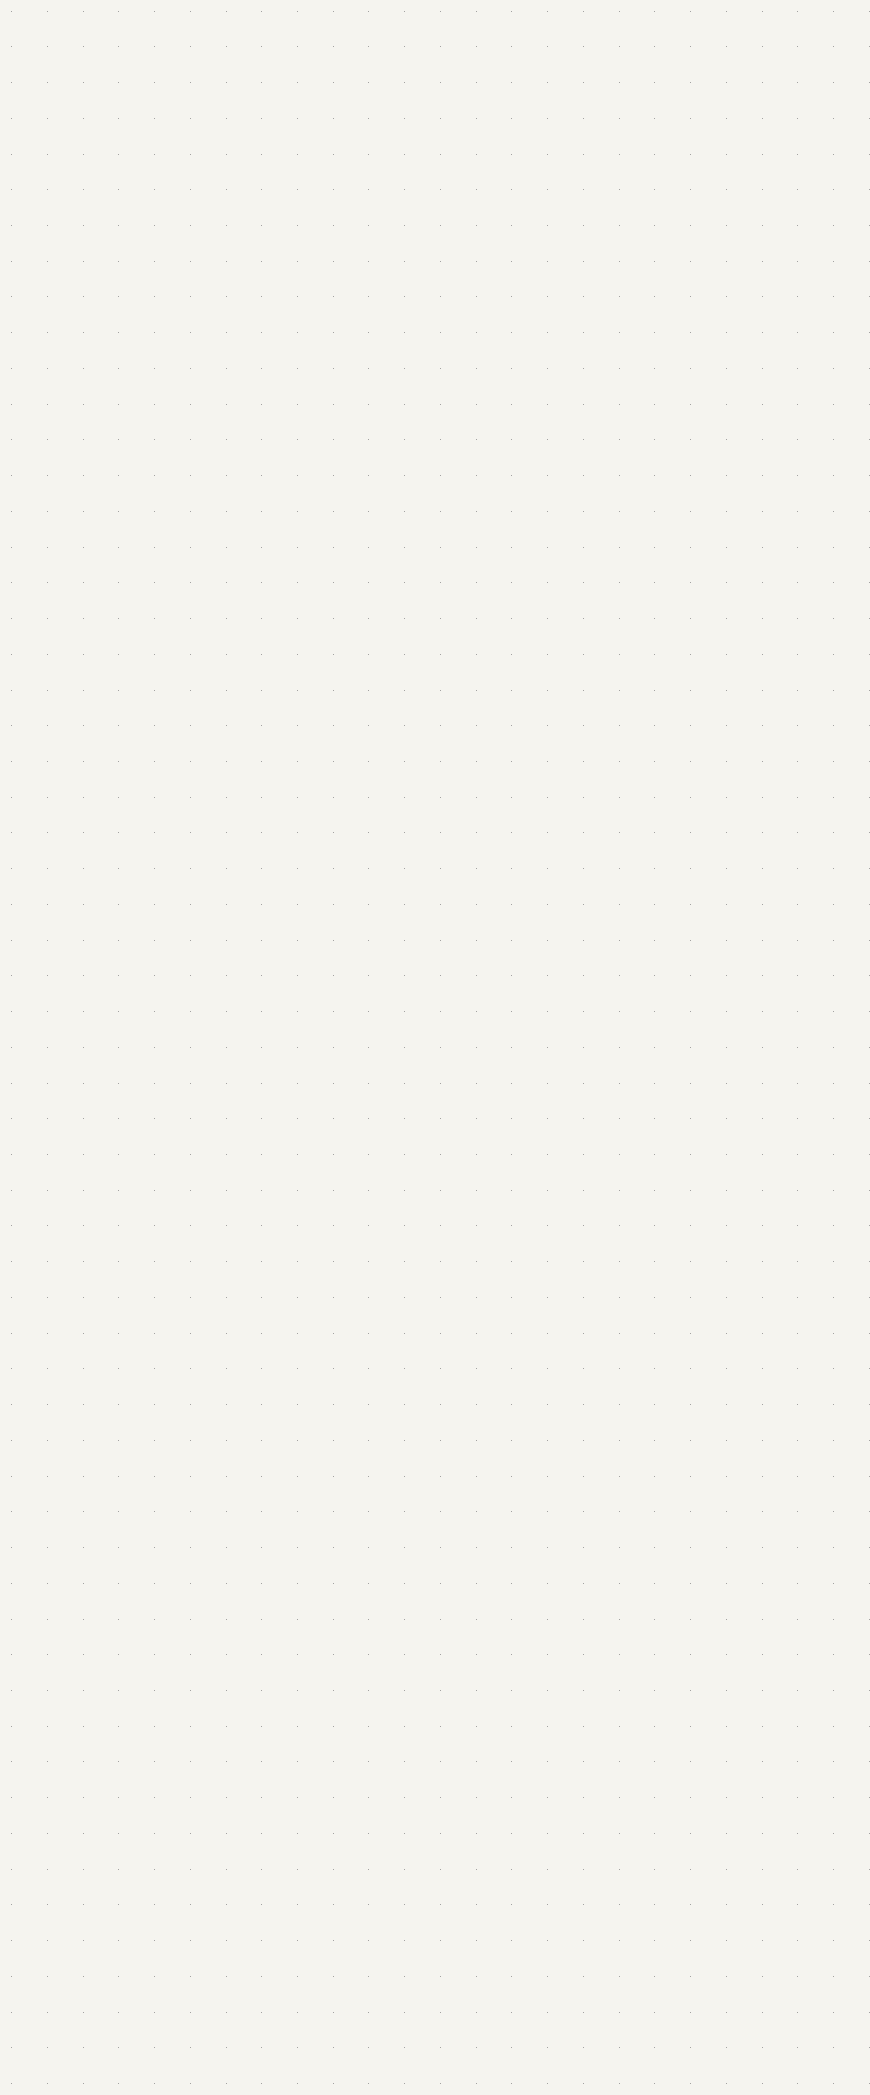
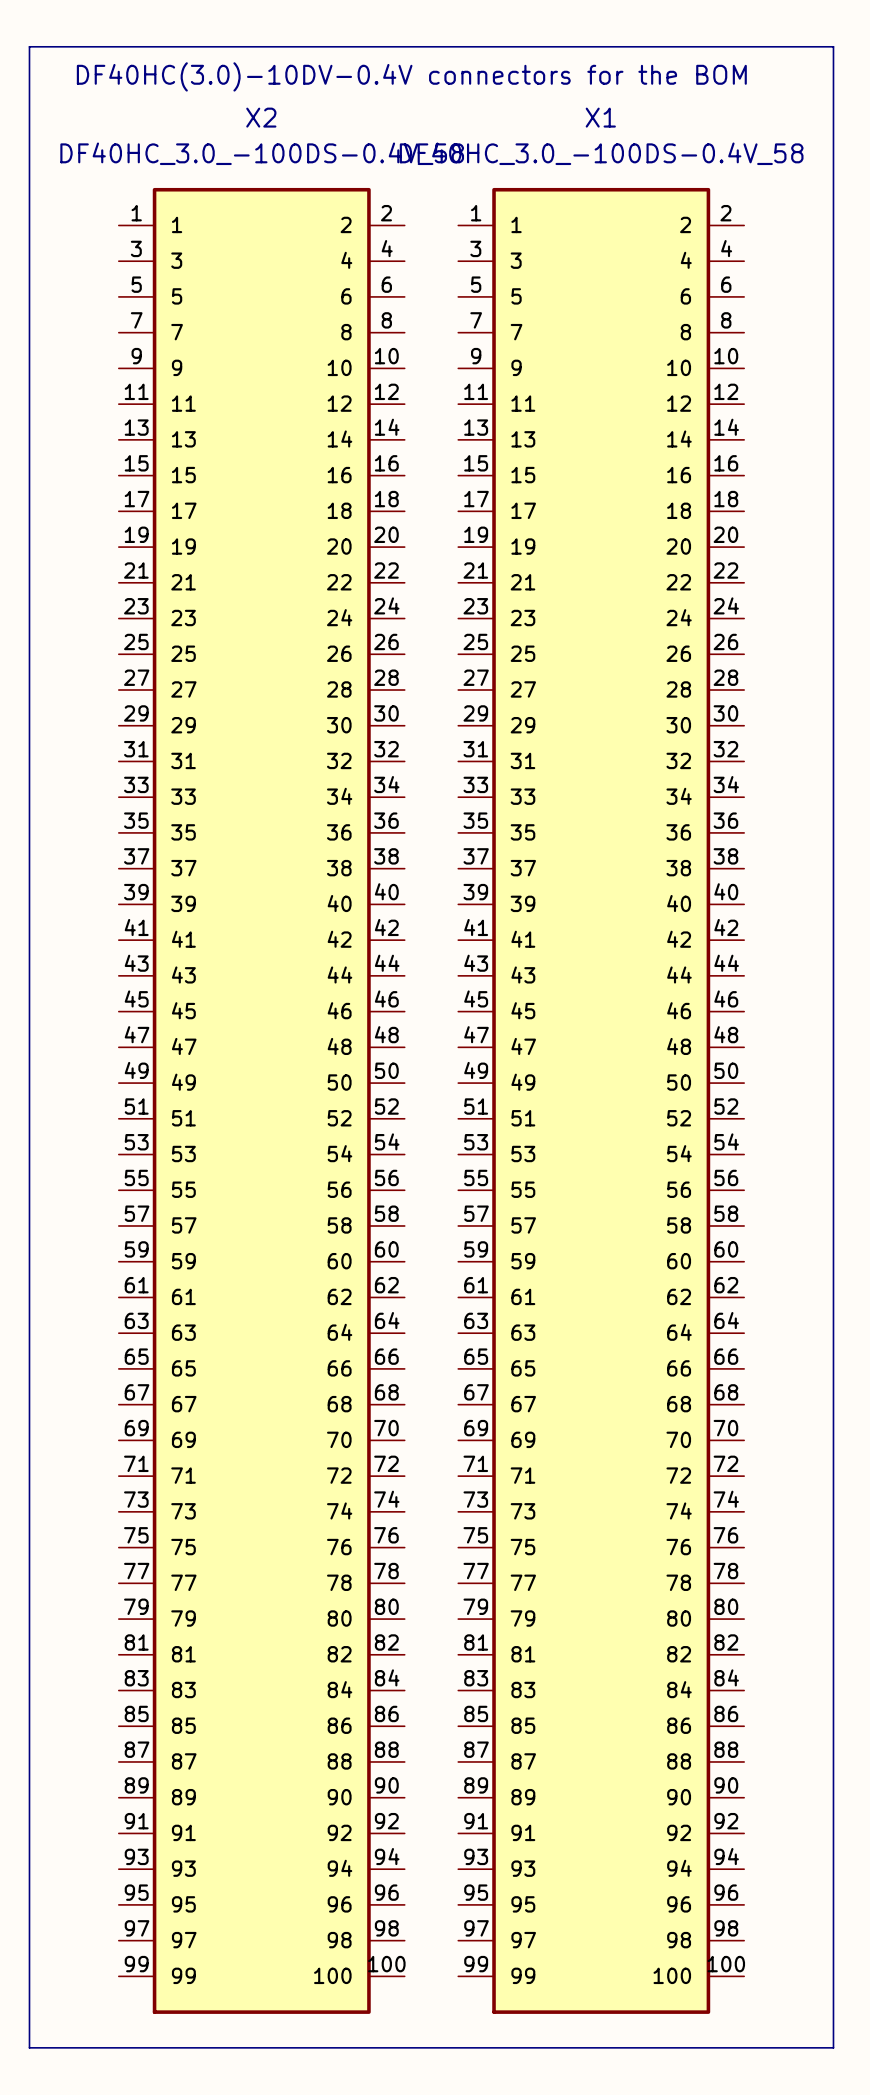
line: none -> (29, 46) (833, 46) (833, 2047) (29, 2047) (29, 46)
text: none -> DF40HC(3.0)-10DV-0.4V connectors for the BOM (411, 76)
X2: none -> DF40HC_3.0_-100DS-0.4V_58 (261, 1100)
X1: none -> DF40HC_3.0_-100DS-0.4V_58 (601, 1100)

